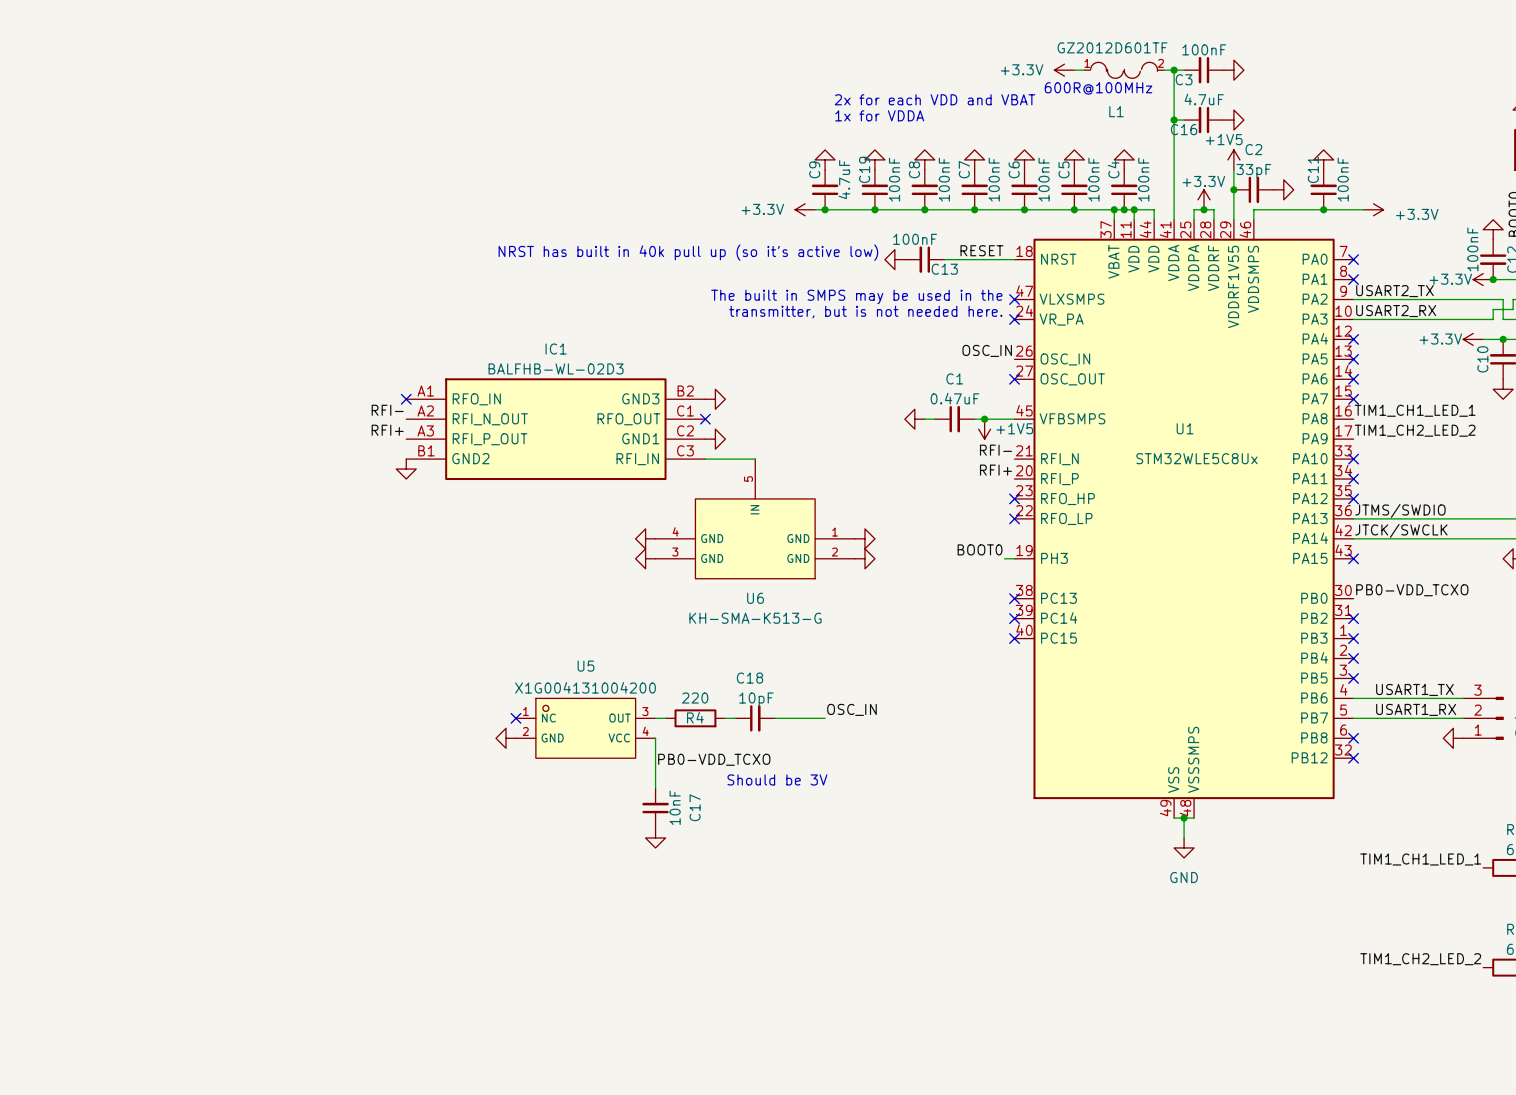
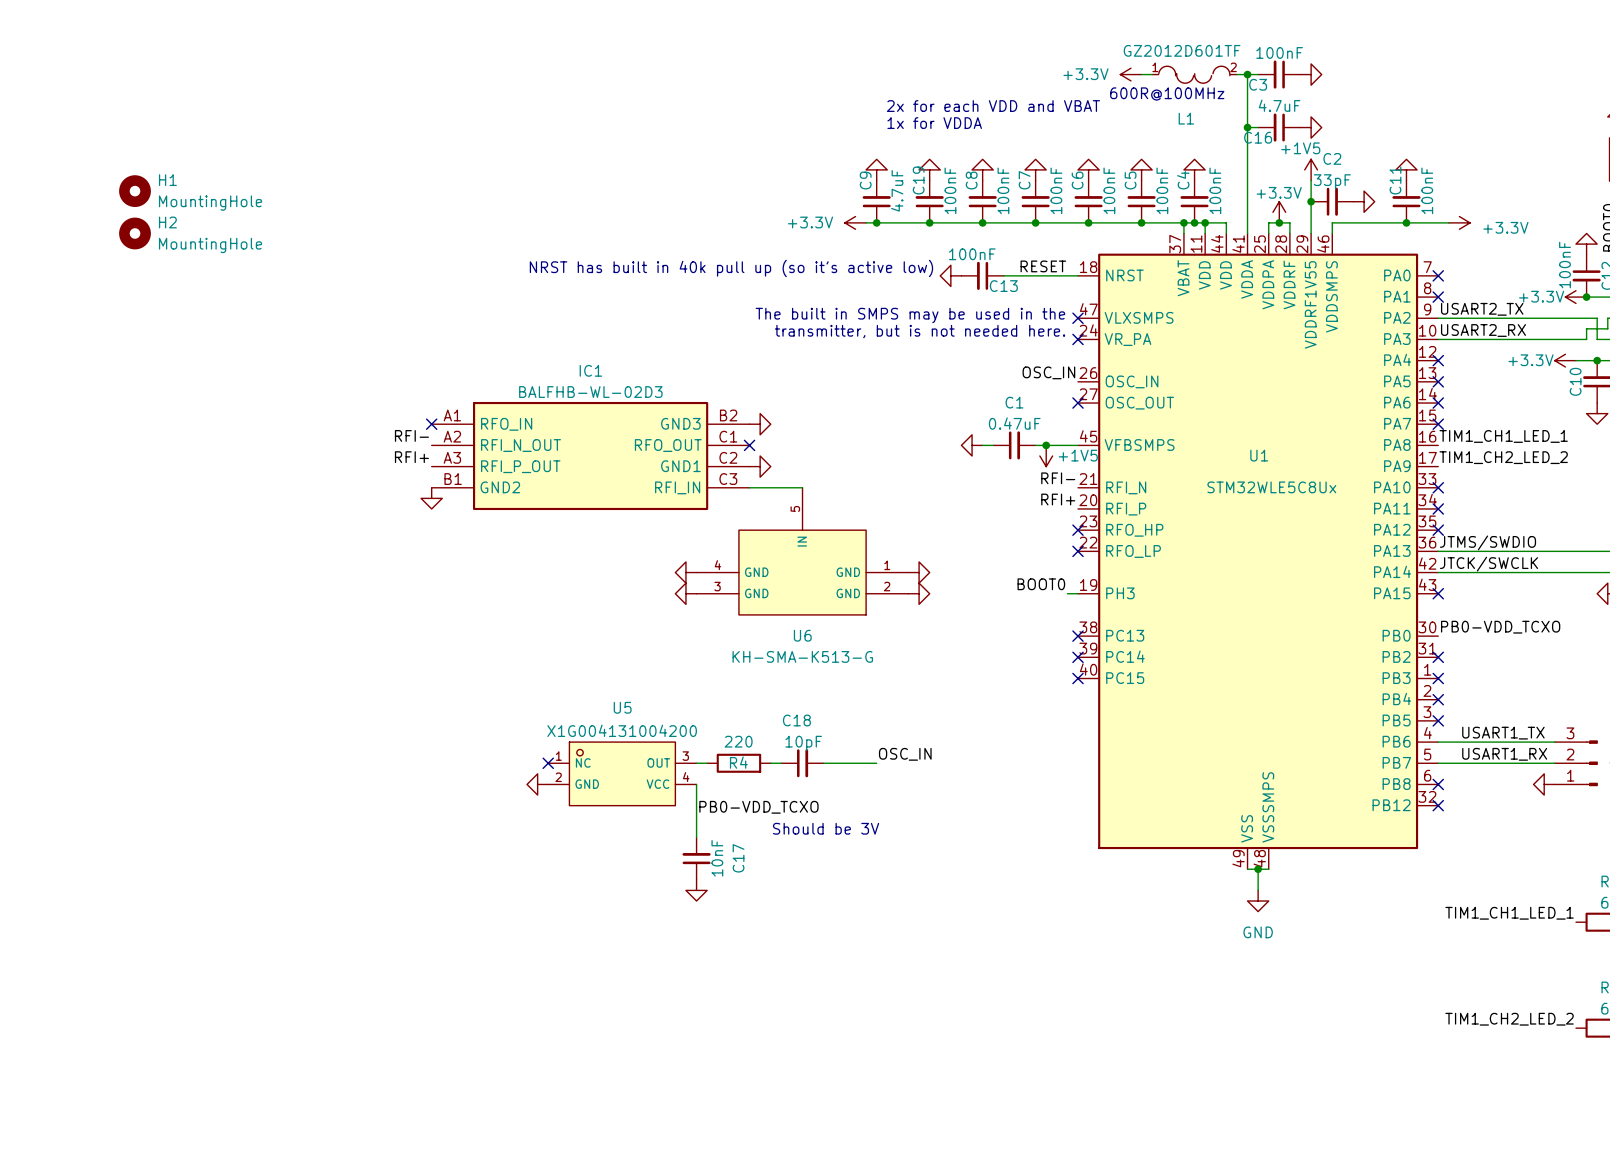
H1: none -> MountingHole (135, 191)
H2: none -> MountingHole (135, 233)

